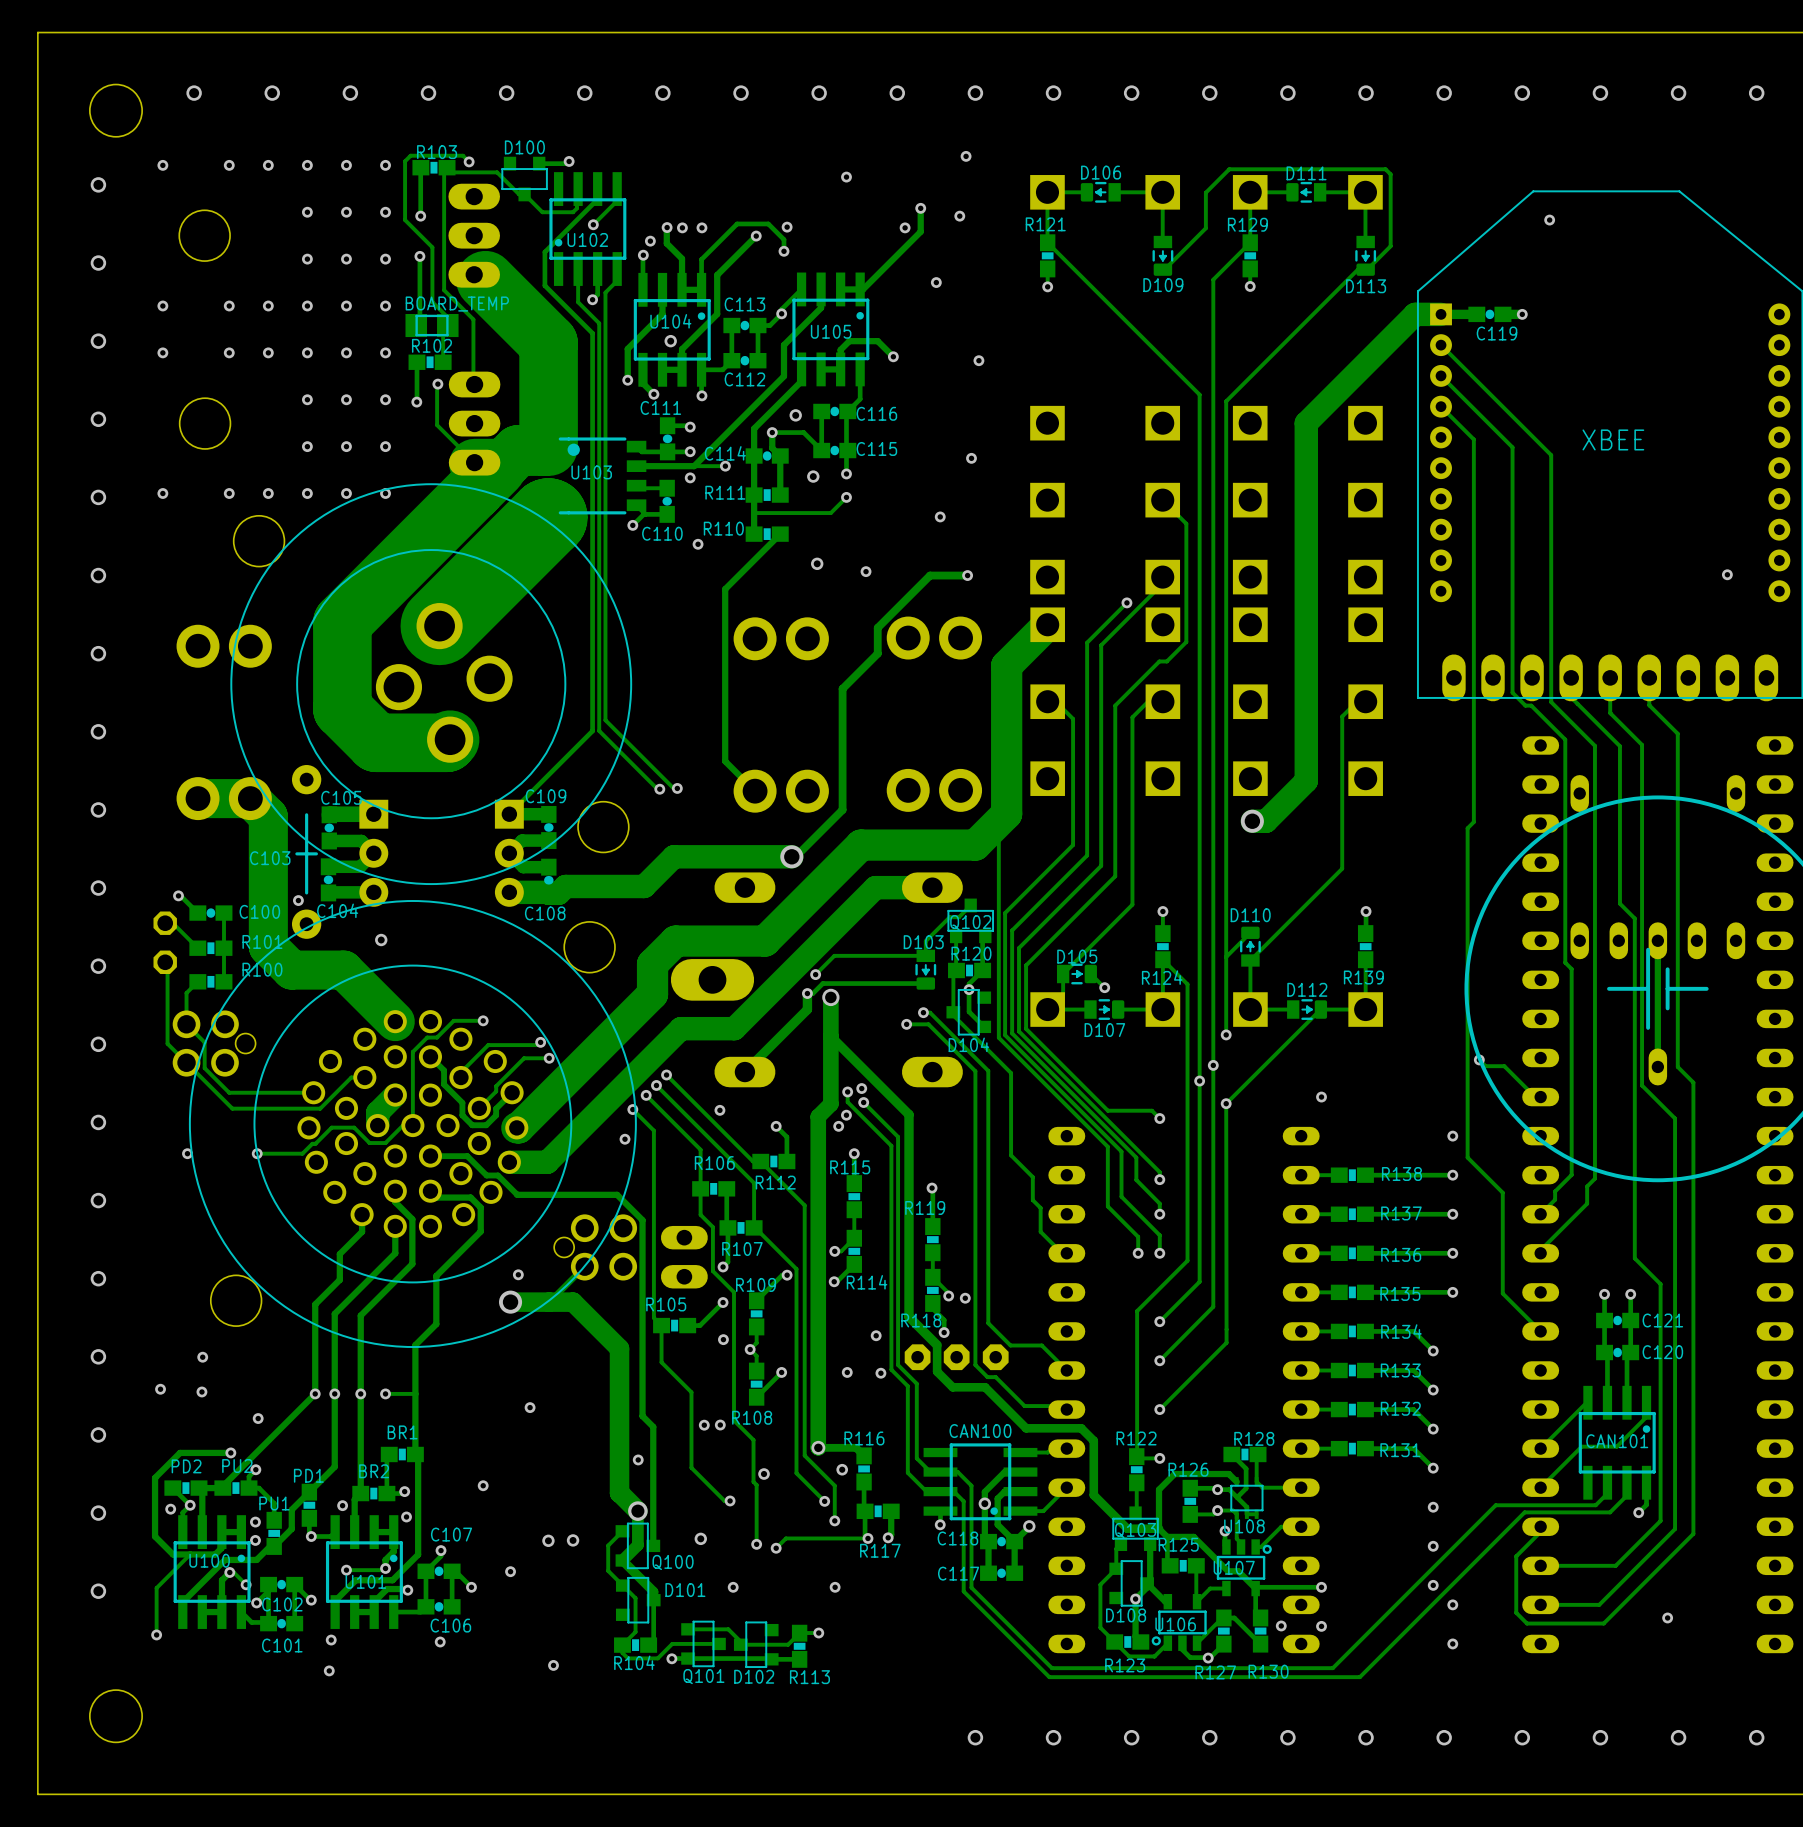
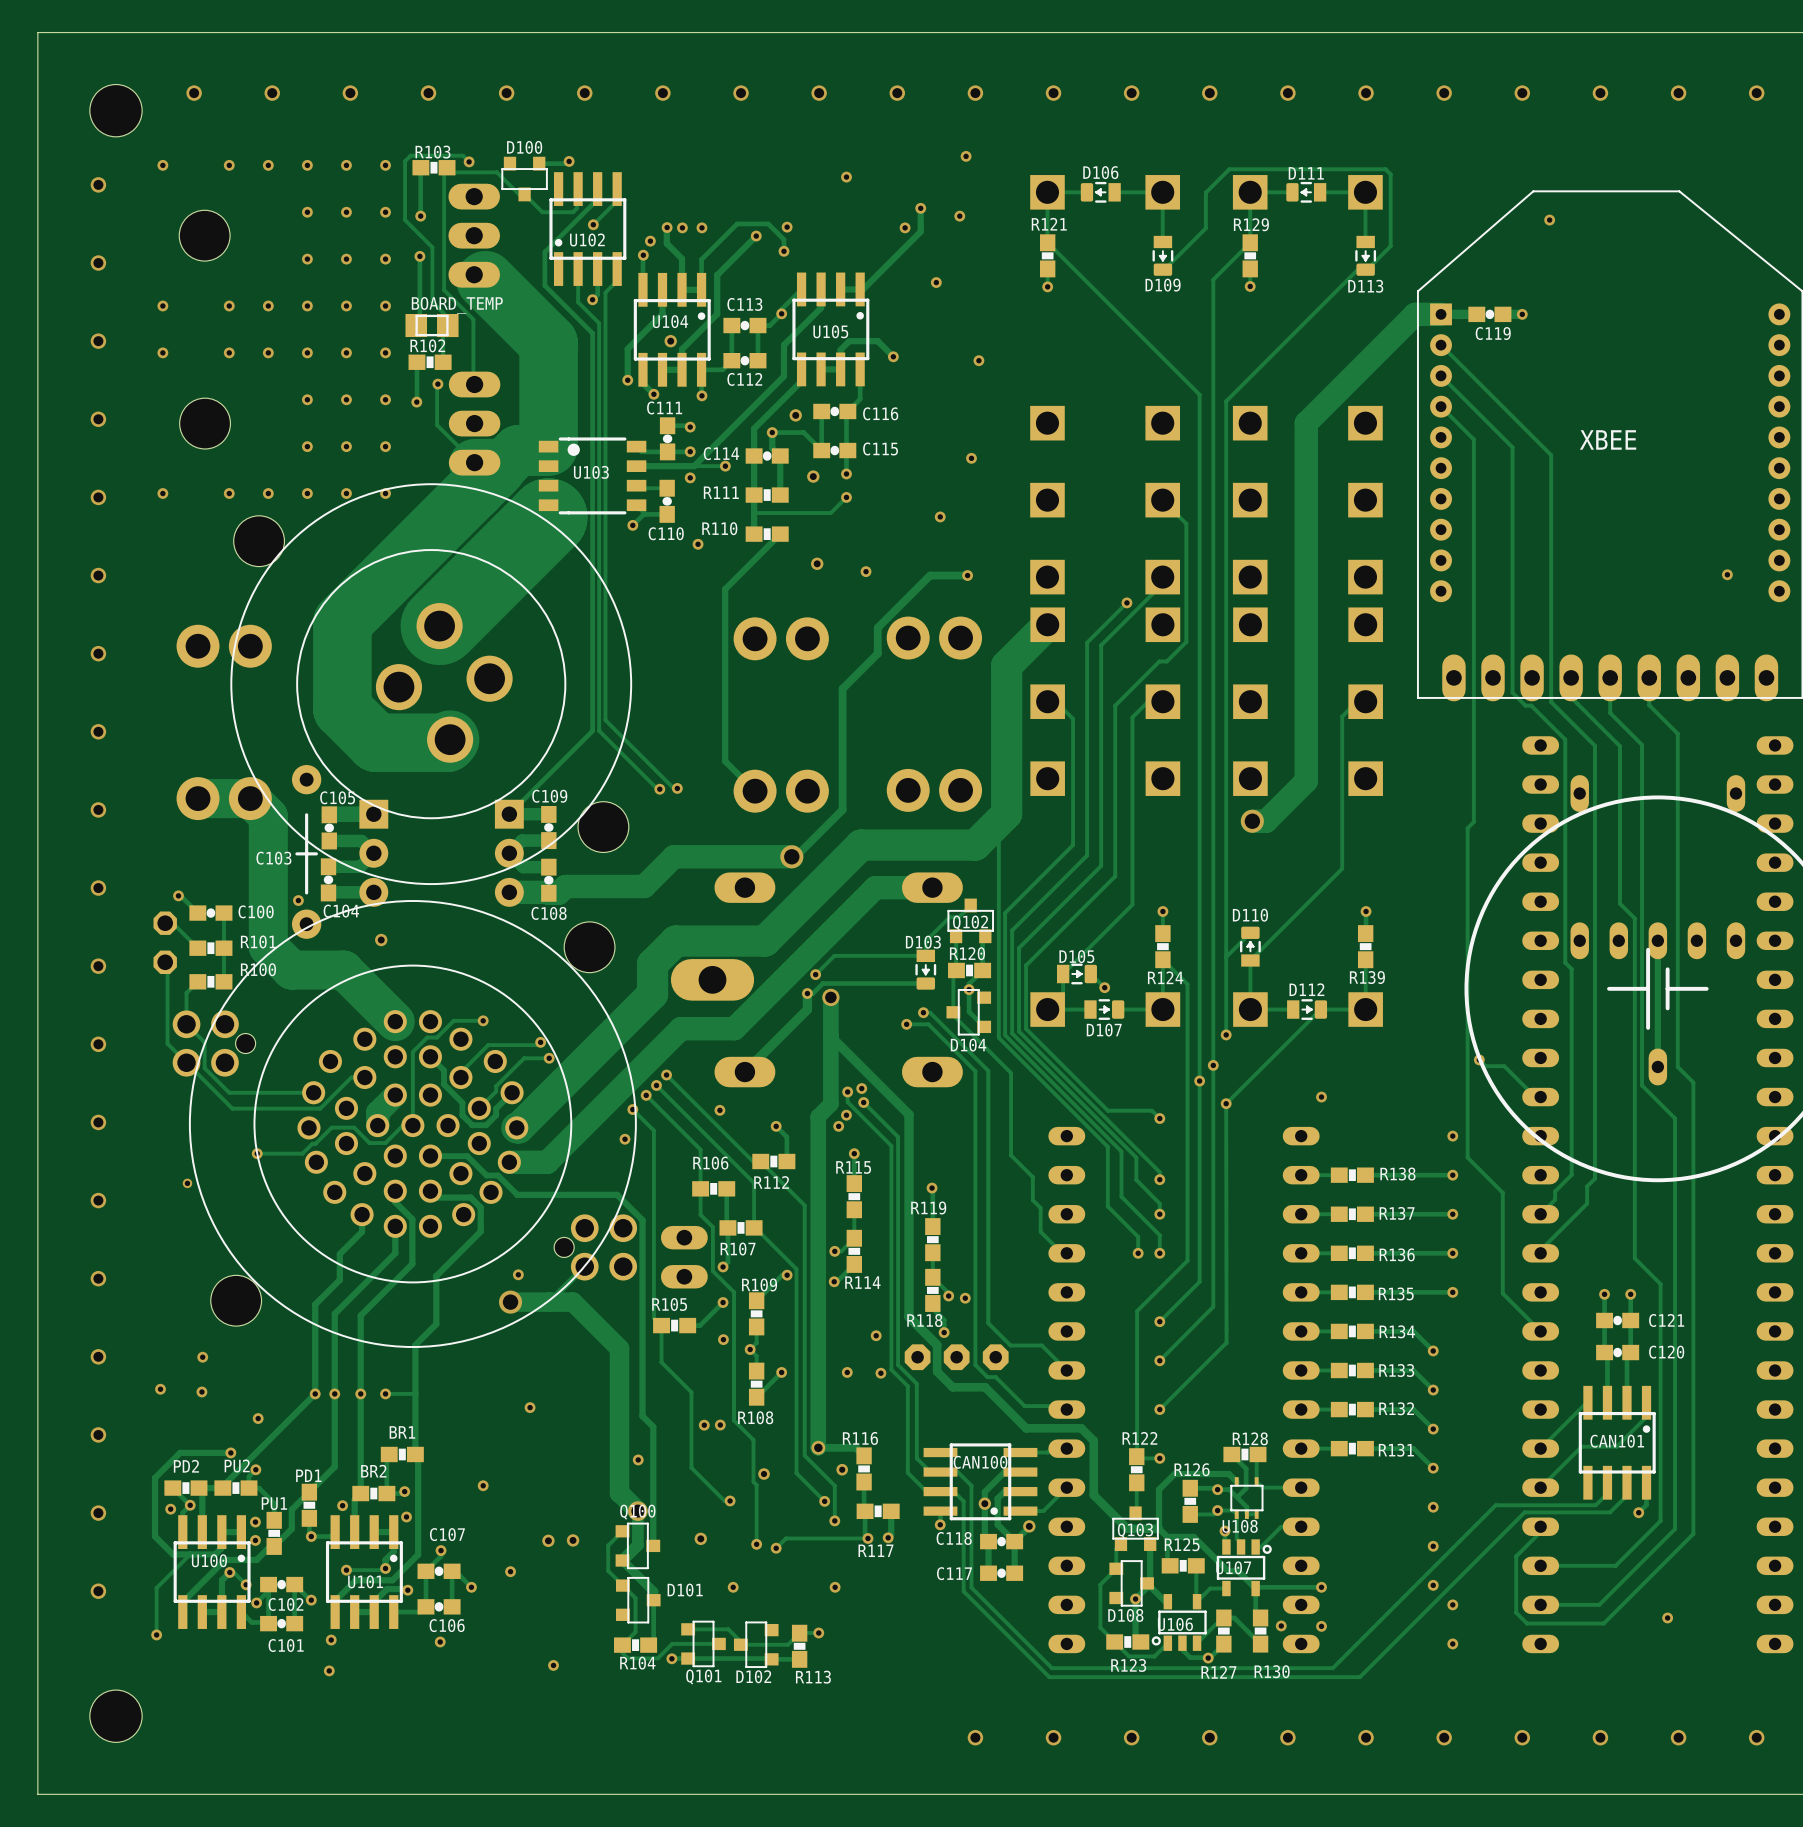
via: (187, 1153) -> none
via: none -> (187, 1183)
CAN100 name position: CAN100 (980, 1431) -> CAN100 (980, 1462)
Q100 name position: Q100 (673, 1562) -> Q100 (637, 1512)

